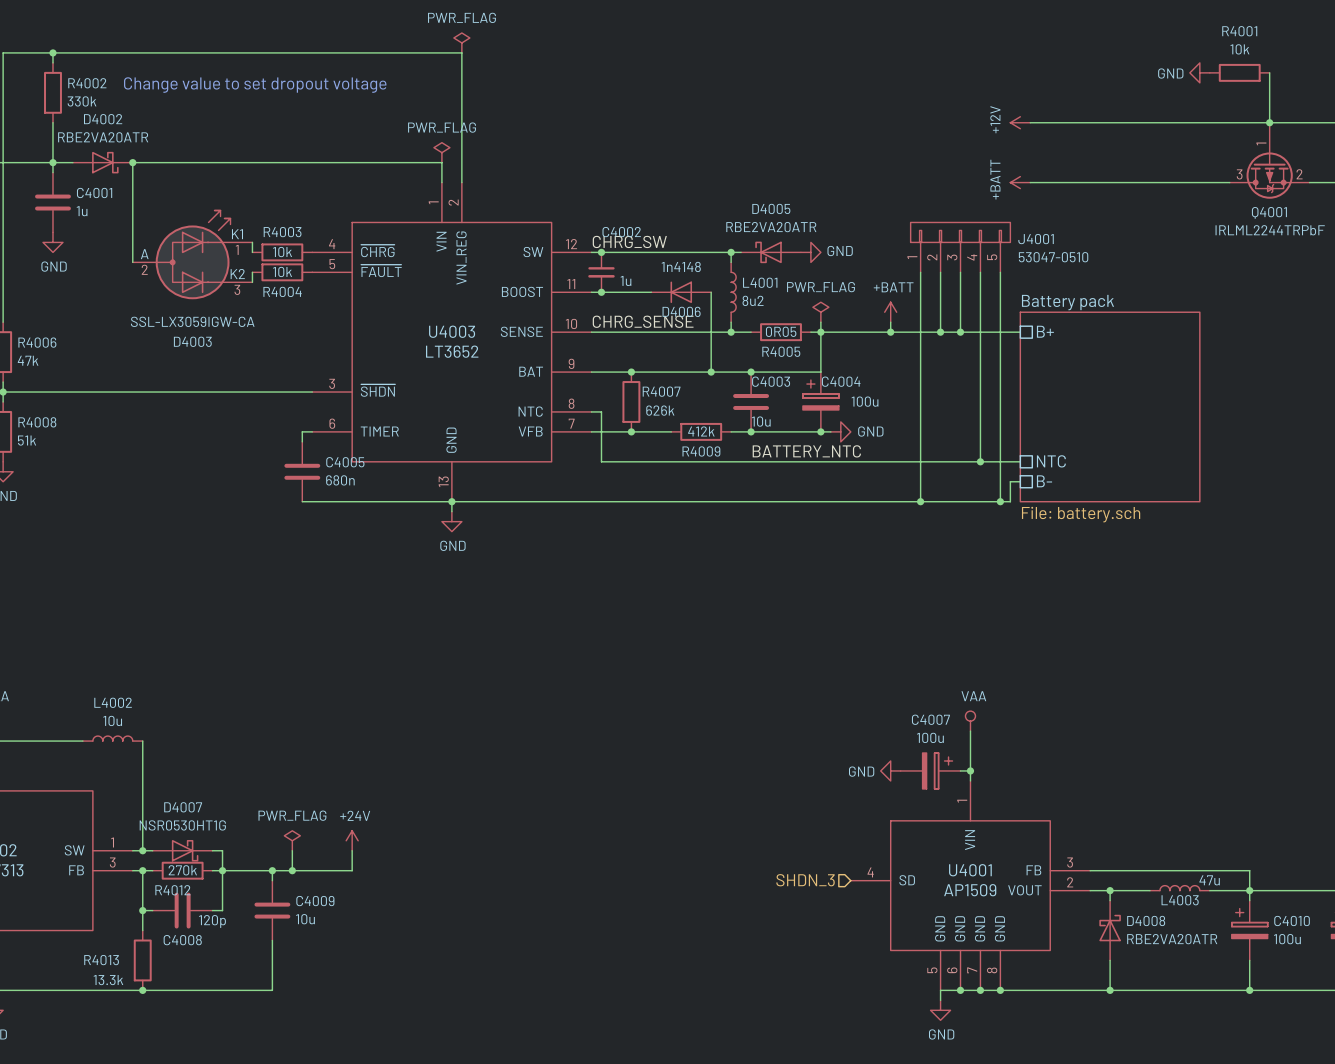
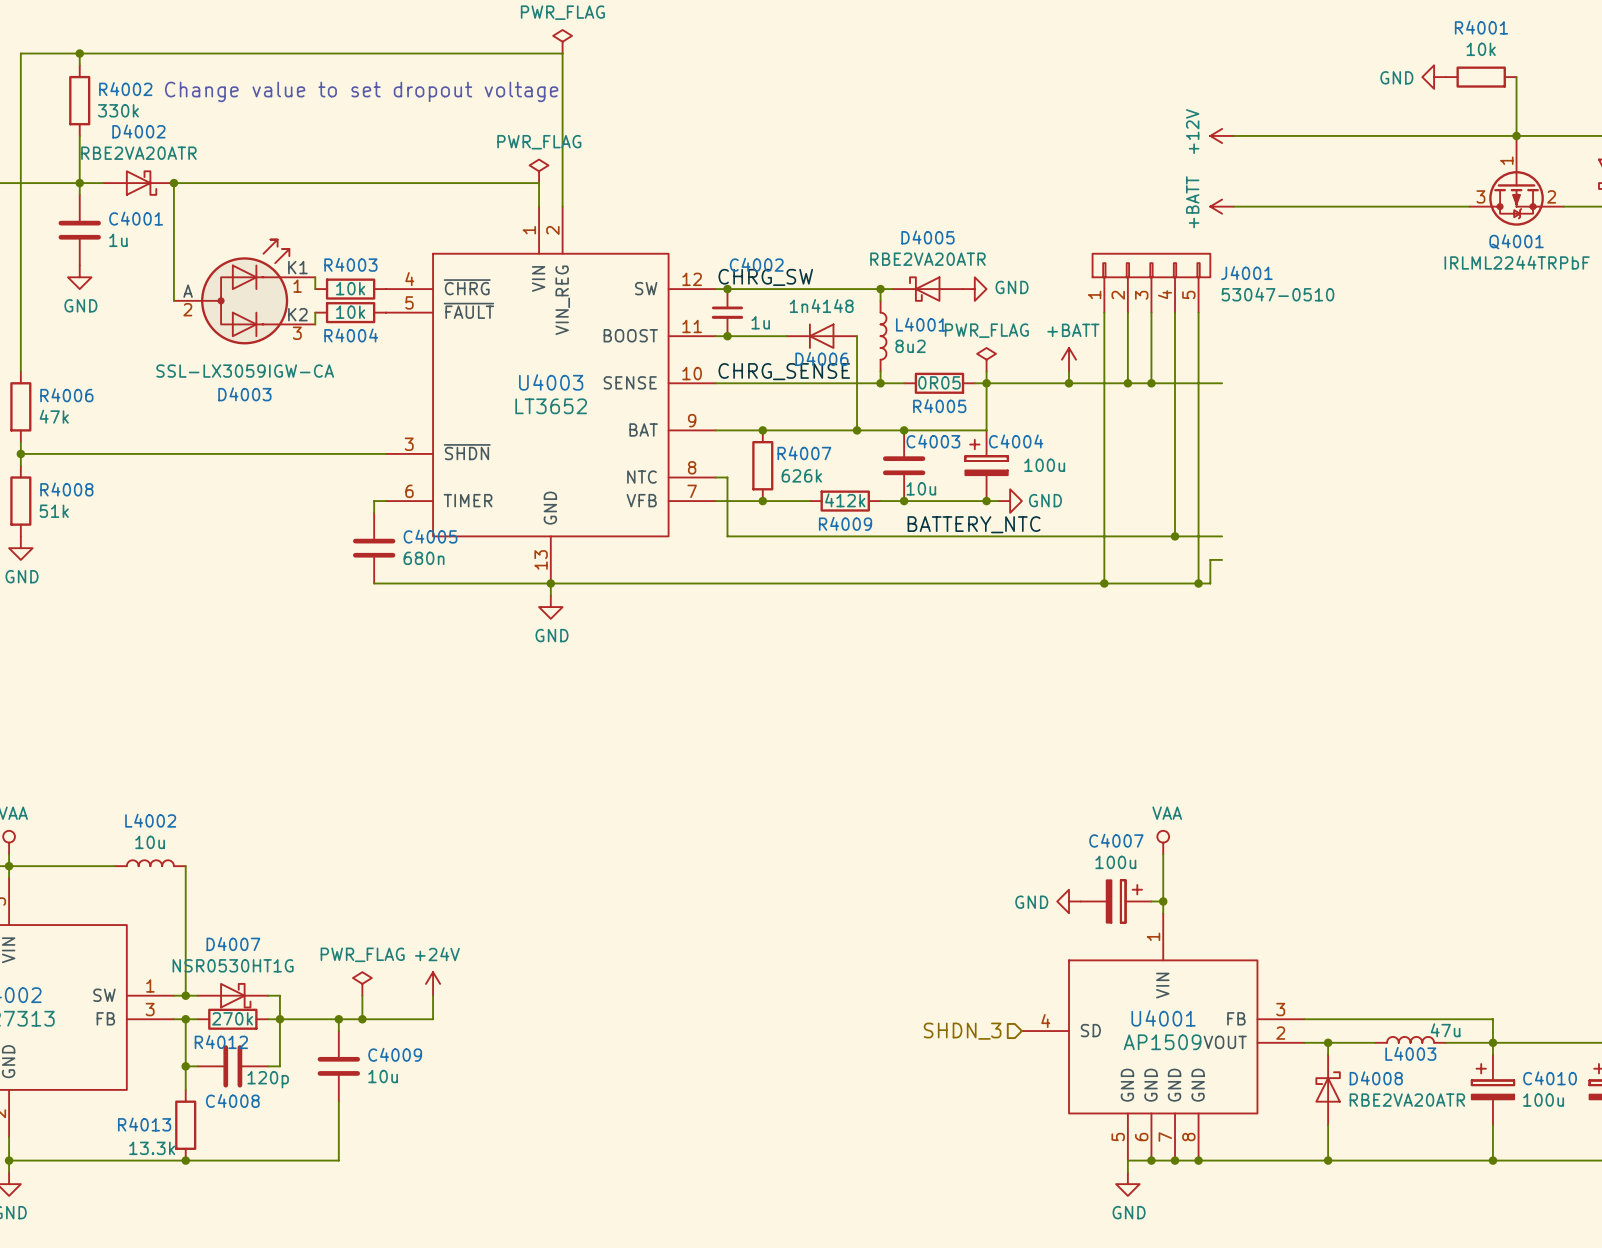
sheet pin: B+ (1045, 331) -> none
sheet Battery pack: File: battery.sch (1110, 406) -> none
sheet pin: NTC (1051, 461) -> none
sheet pin: B- (1044, 481) -> none

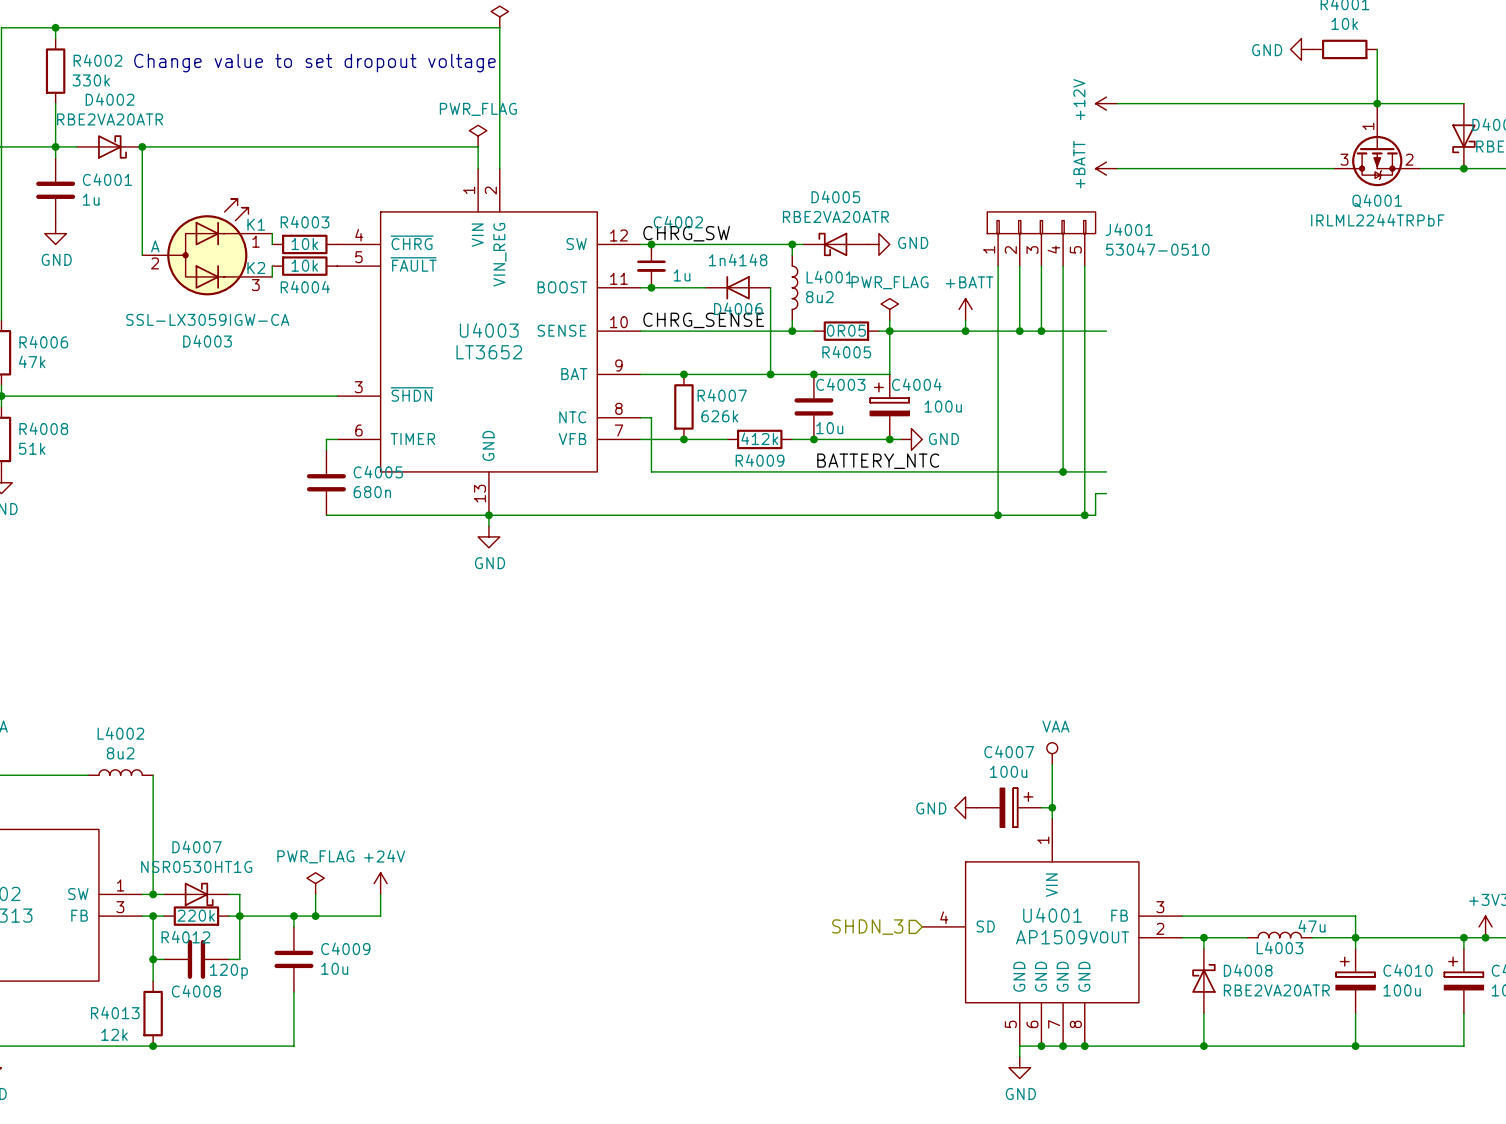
L4002 value: 10u (150, 842) -> 8u2 (120, 753)
R4012 value: 270k (232, 1018) -> 220k (196, 915)
R4013 value: 13.3k (152, 1148) -> 12k (114, 1034)

